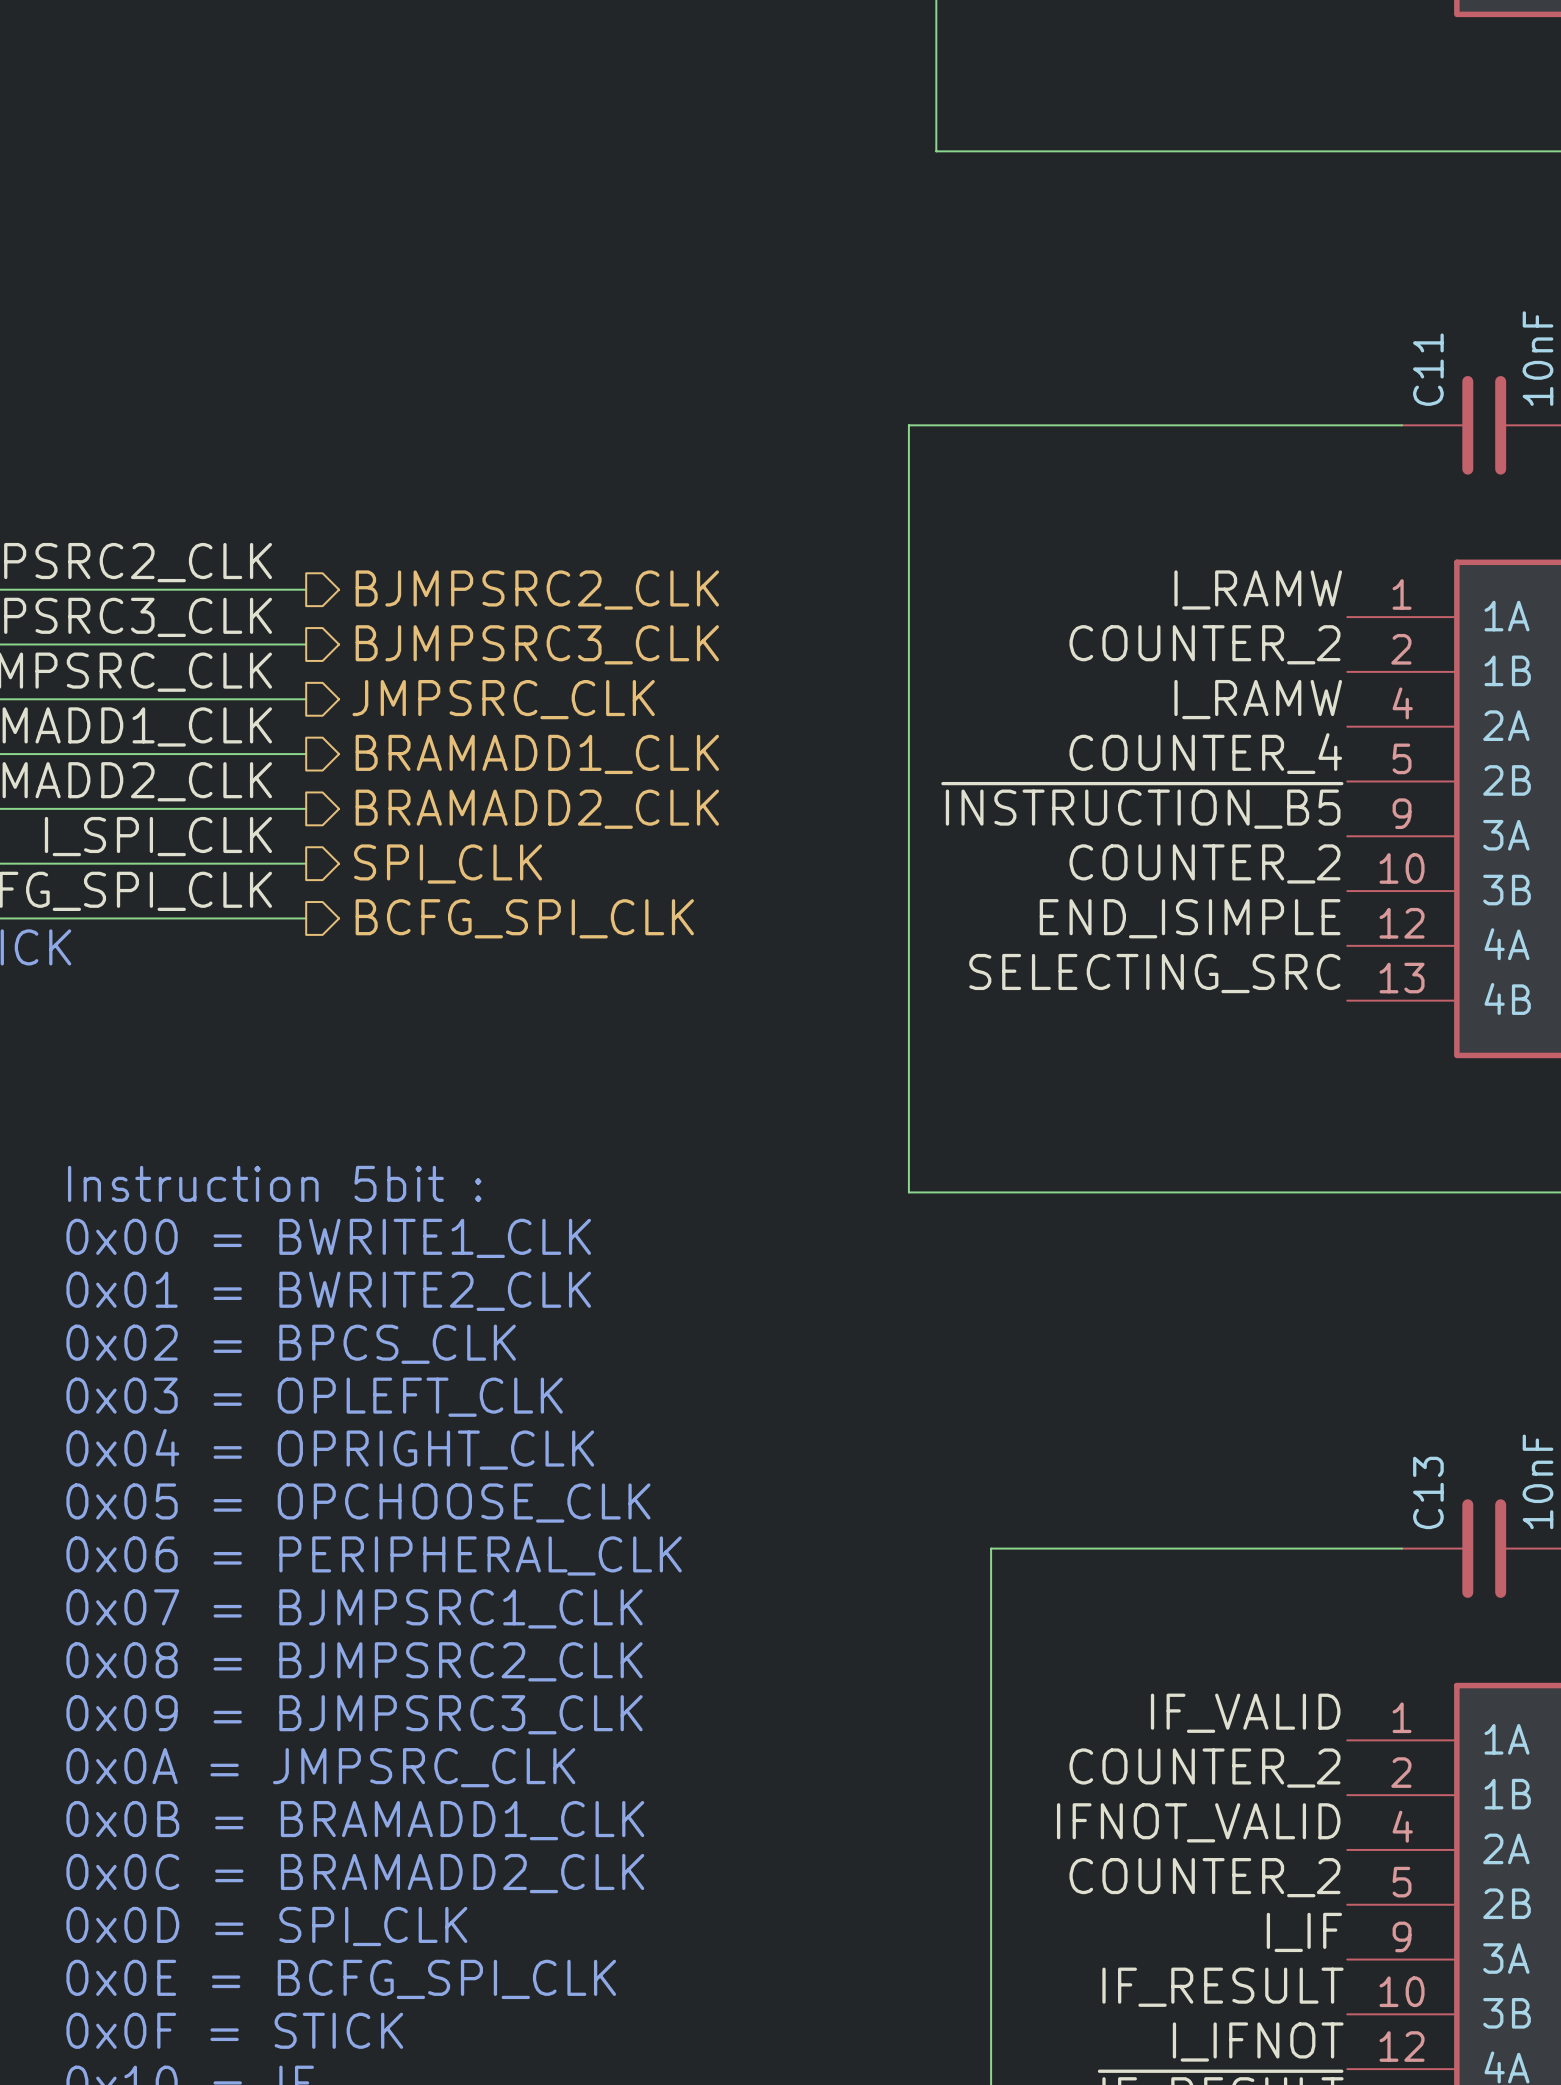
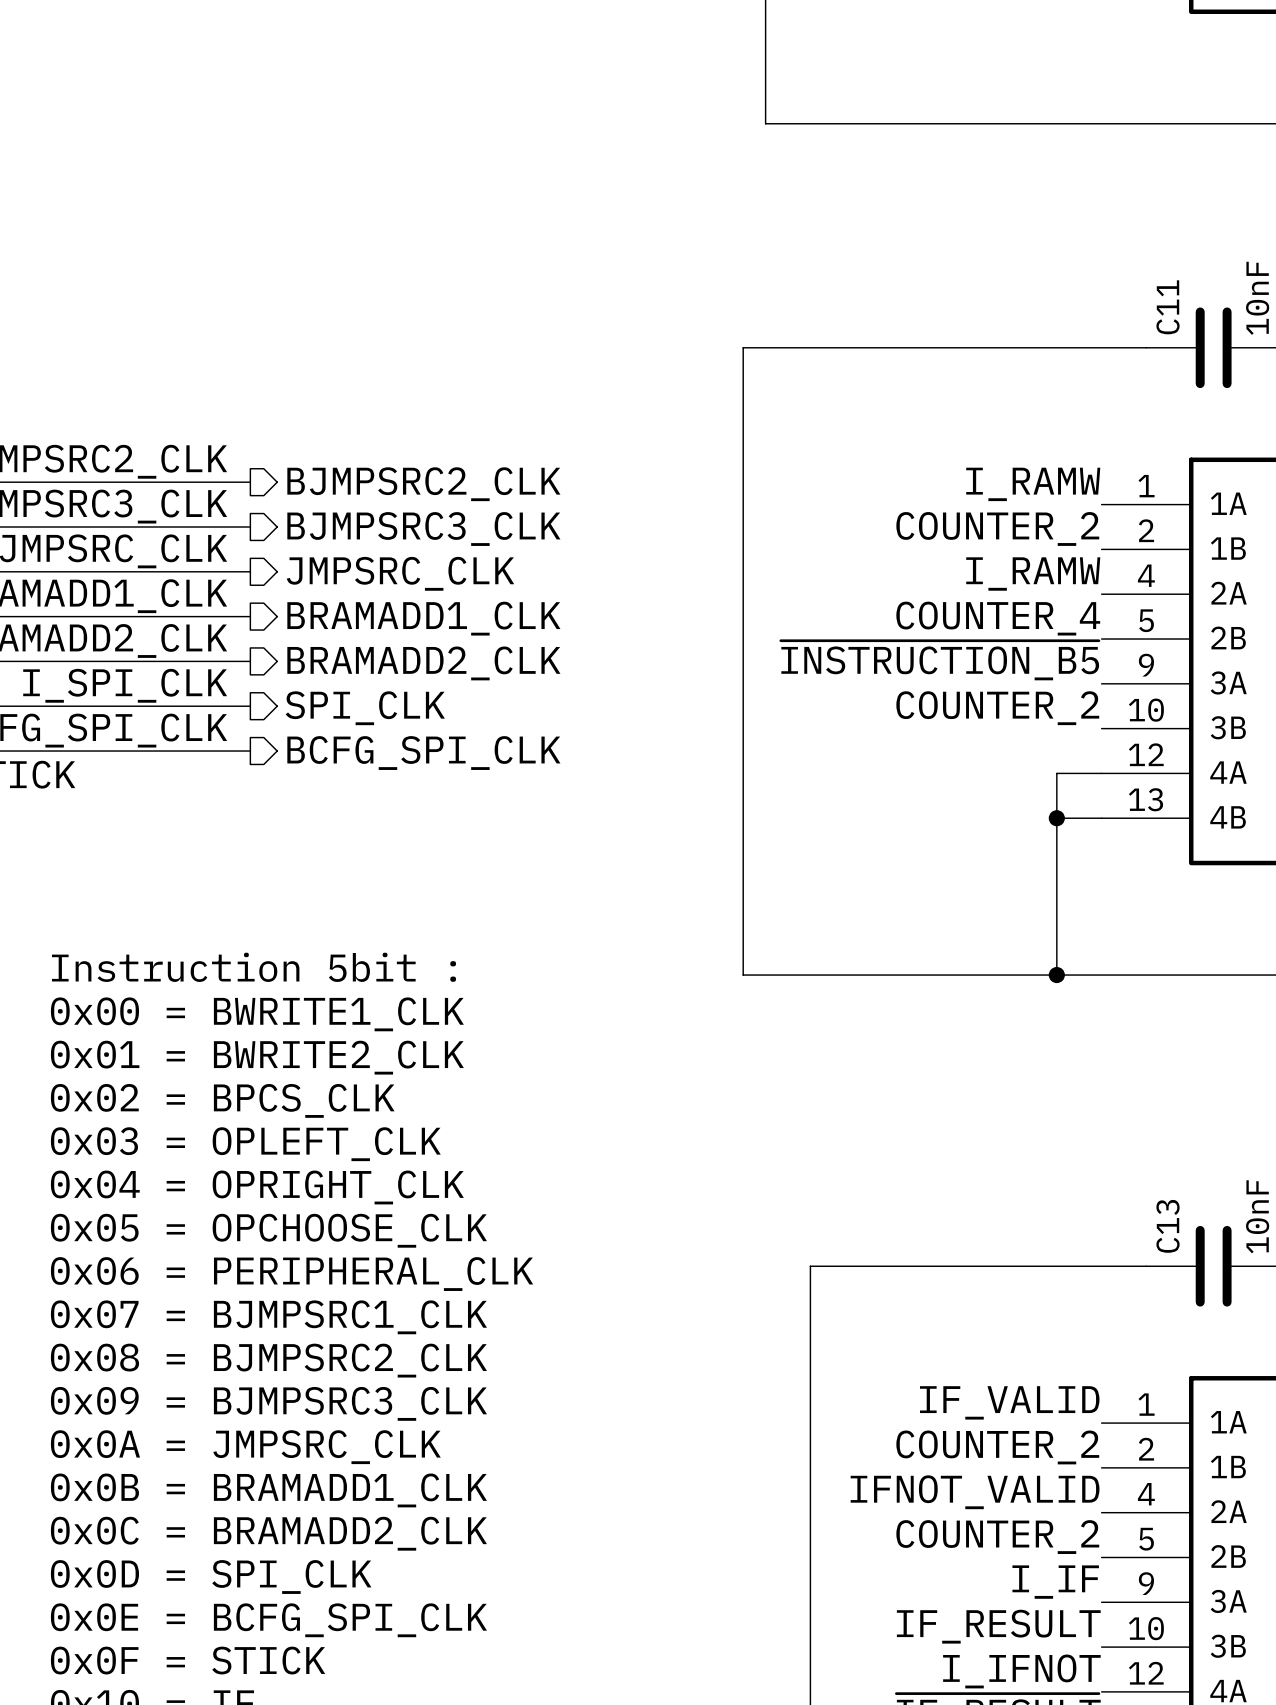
label: END_ISIMPLE (1190, 918) -> none
wire: none -> (1101, 773) (1056, 773) (1056, 975)
label: SELECTING_SRC (1154, 973) -> none
wire: none -> (1056, 818) (1101, 818)
junction: none -> (1056, 818)
junction: none -> (1056, 975)

